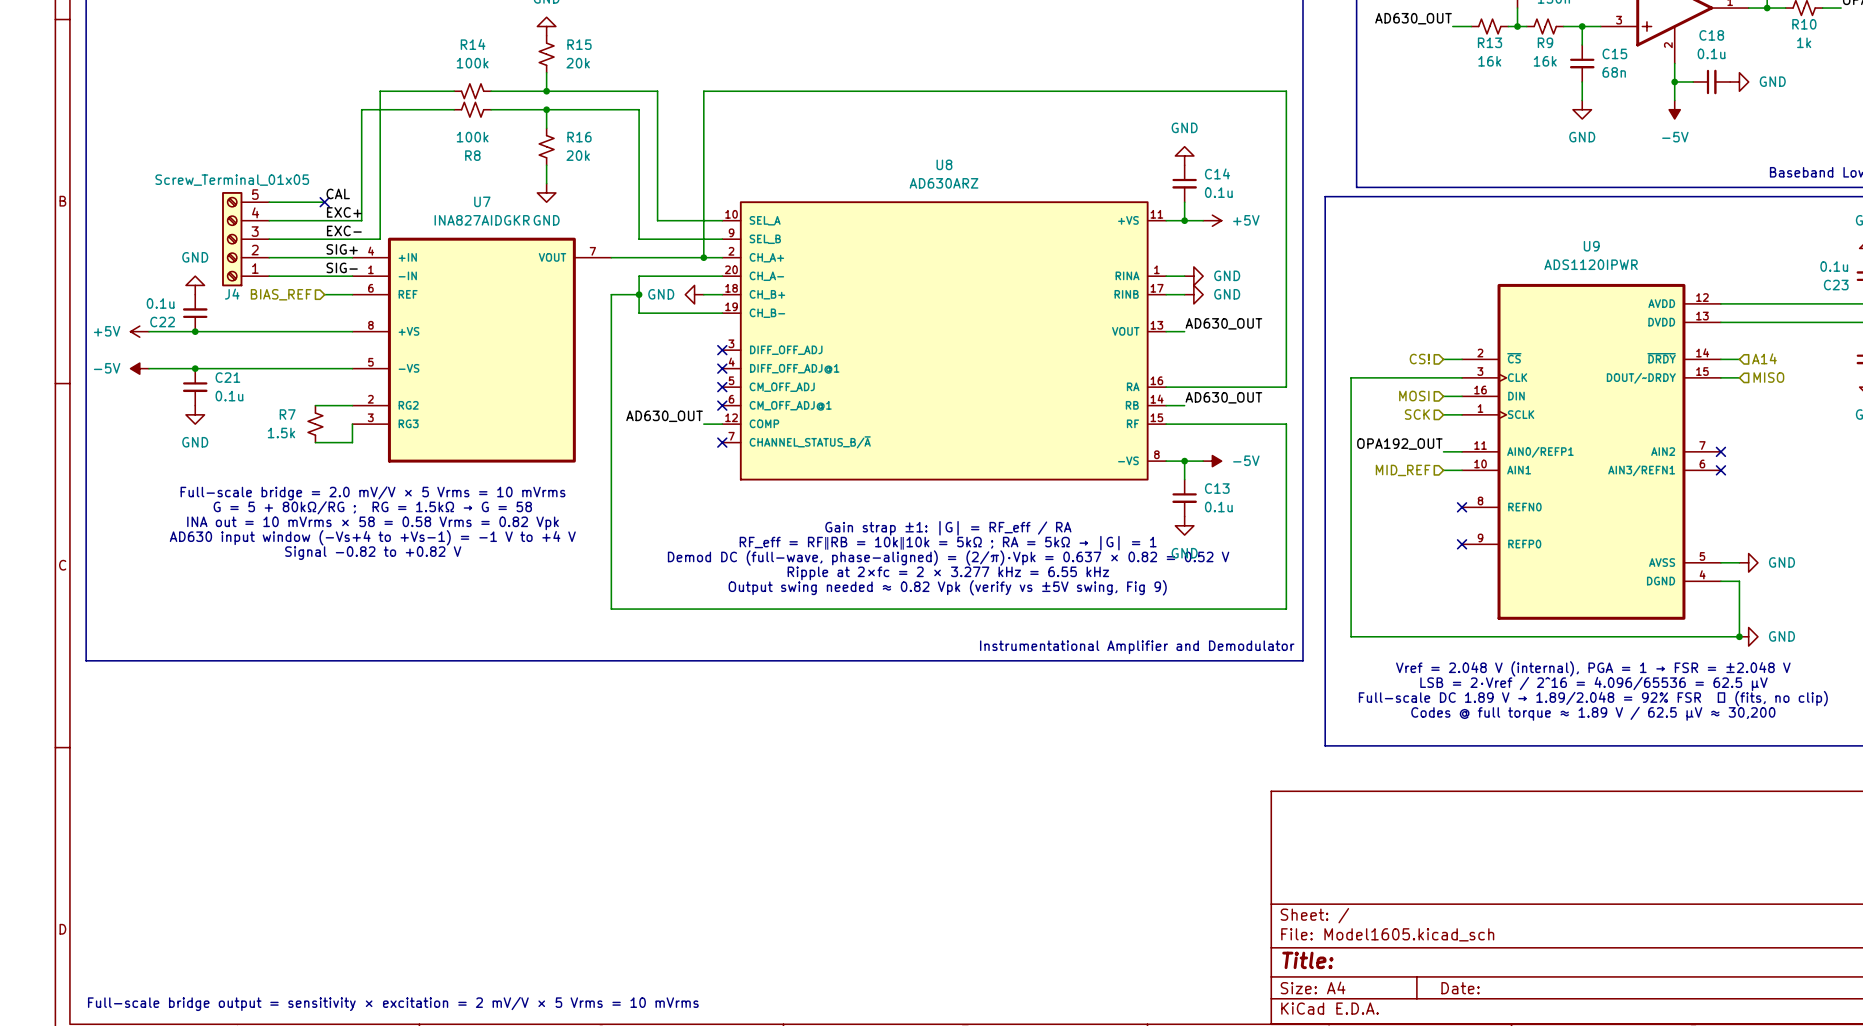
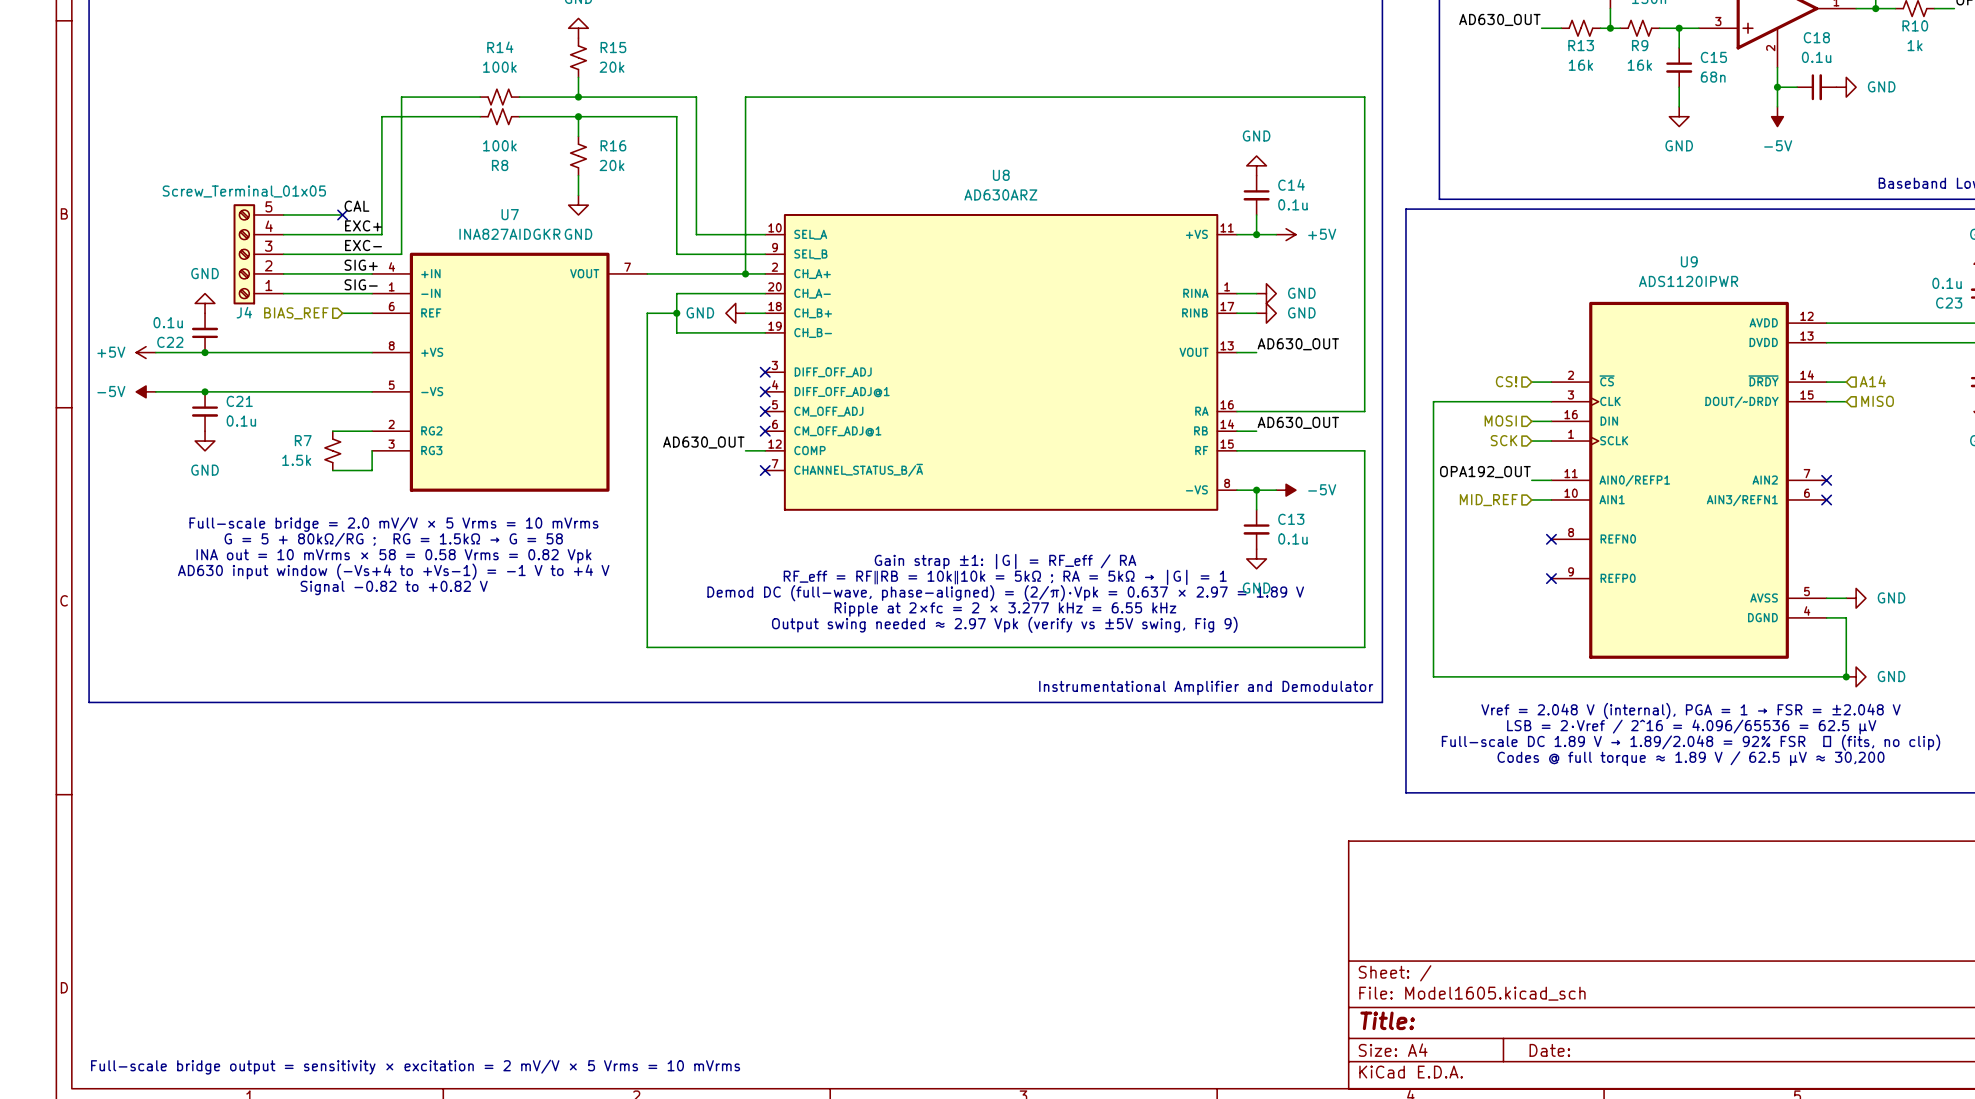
text: Demod DC (full-wave, phase-aligned) = (2/π)·Vpk = 0.637 × 0.82 = 0.52 V (948, 558) -> Demod DC (full-wave, phase-aligned) = (2/π)·Vpk = 0.637 × 2.97 = 1.89 V (1005, 593)
text: Output swing needed ≈ 0.82 Vpk (verify vs ±5V swing, Fig 9) (947, 587) -> Output swing needed ≈ 2.97 Vpk (verify vs ±5V swing, Fig 9) (1004, 624)

